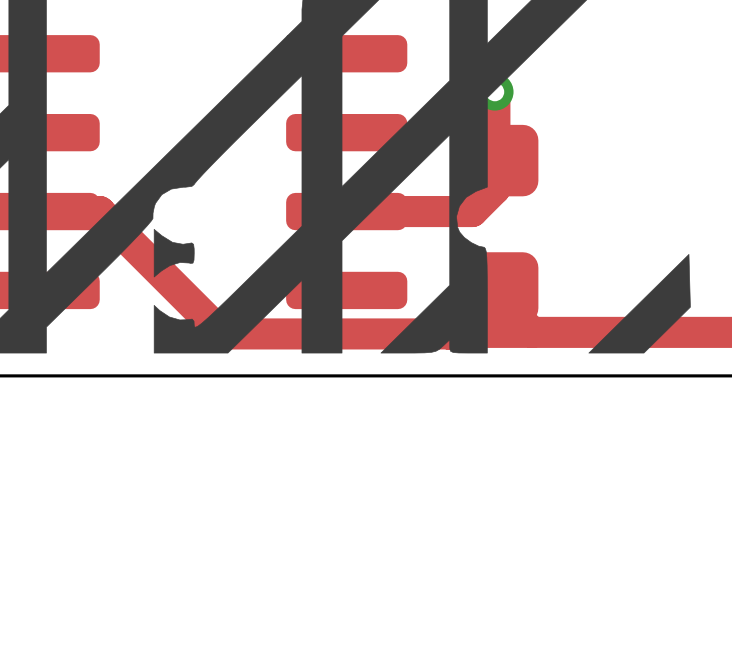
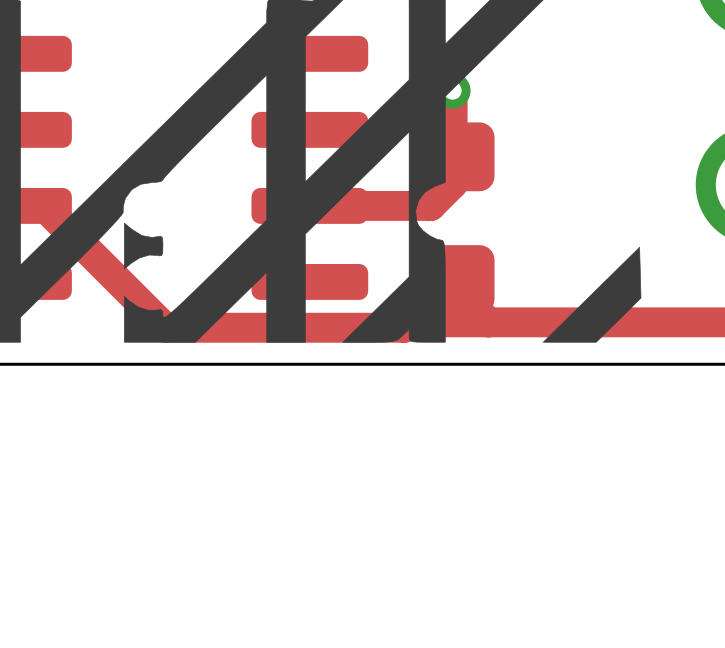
top track: (70, 211) (99, 211) (222, 333) (448, 333) -> (43, 205) (165, 327) (404, 327) (408, 323)

